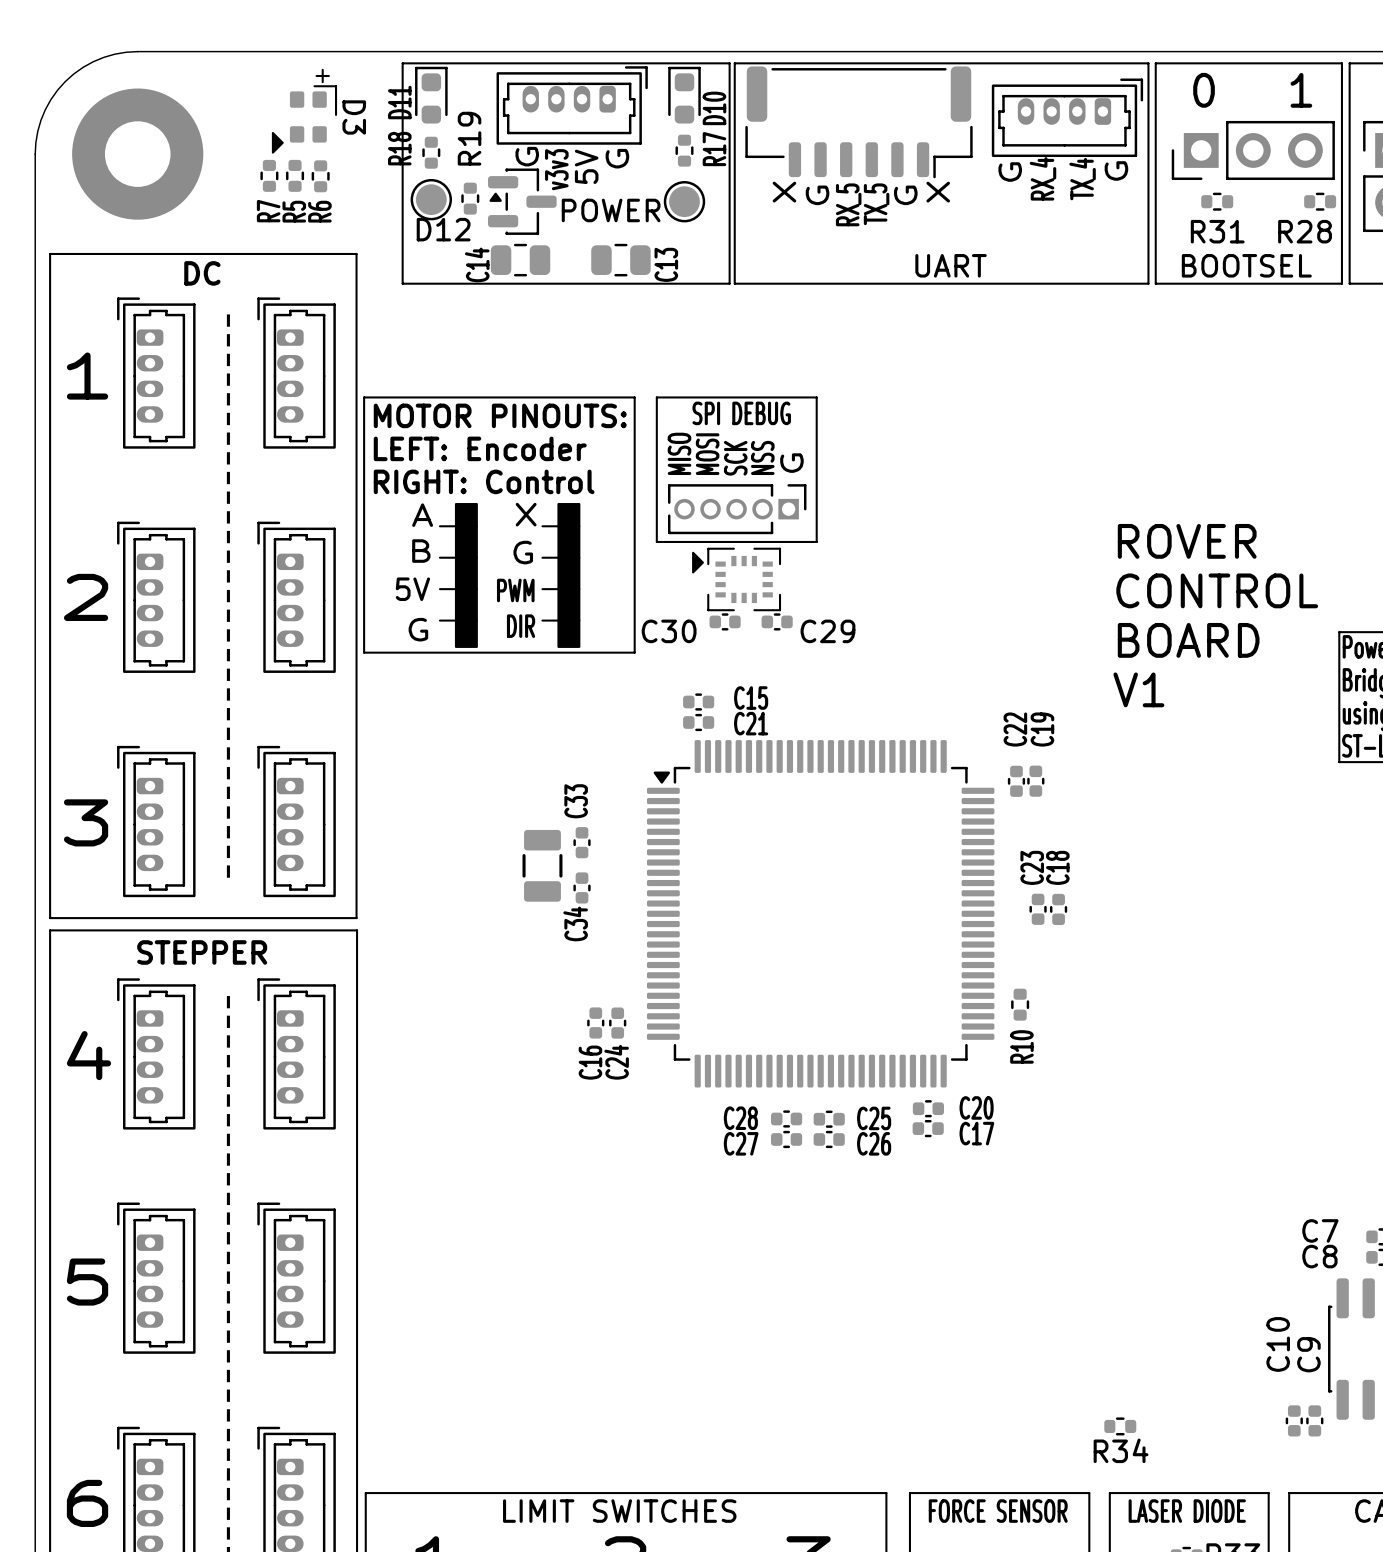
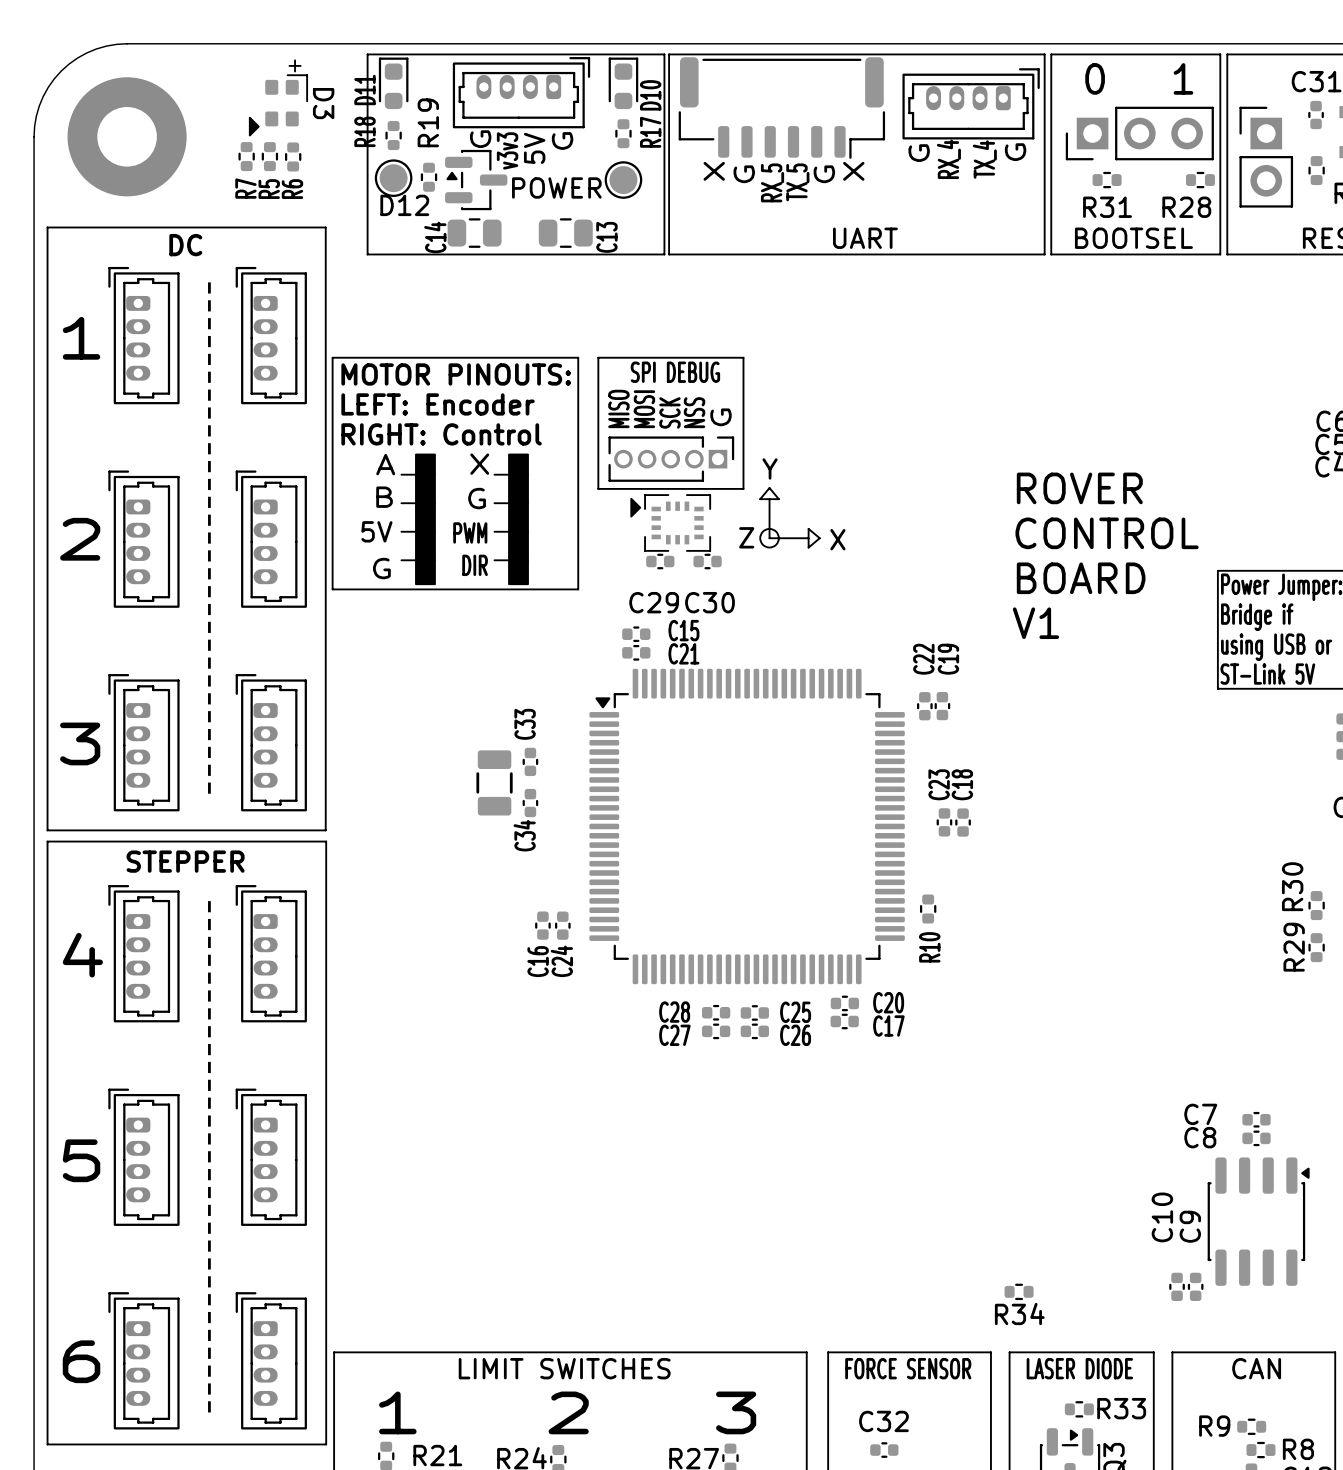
text: none -> Y (770, 468)
line: none -> (769, 488) (760, 499) (778, 499) (769, 488)
line: none -> (769, 499) (769, 538) (808, 538)
drawing: none -> [759, 528, 780, 549]
line: none -> (808, 528) (819, 538) (808, 547) (808, 528)
text: none -> Z (746, 537)
text: none -> X (837, 539)
C30 name position: C30 (669, 631) -> C30 (709, 602)
C29 name position: C29 (827, 631) -> C29 (654, 602)

